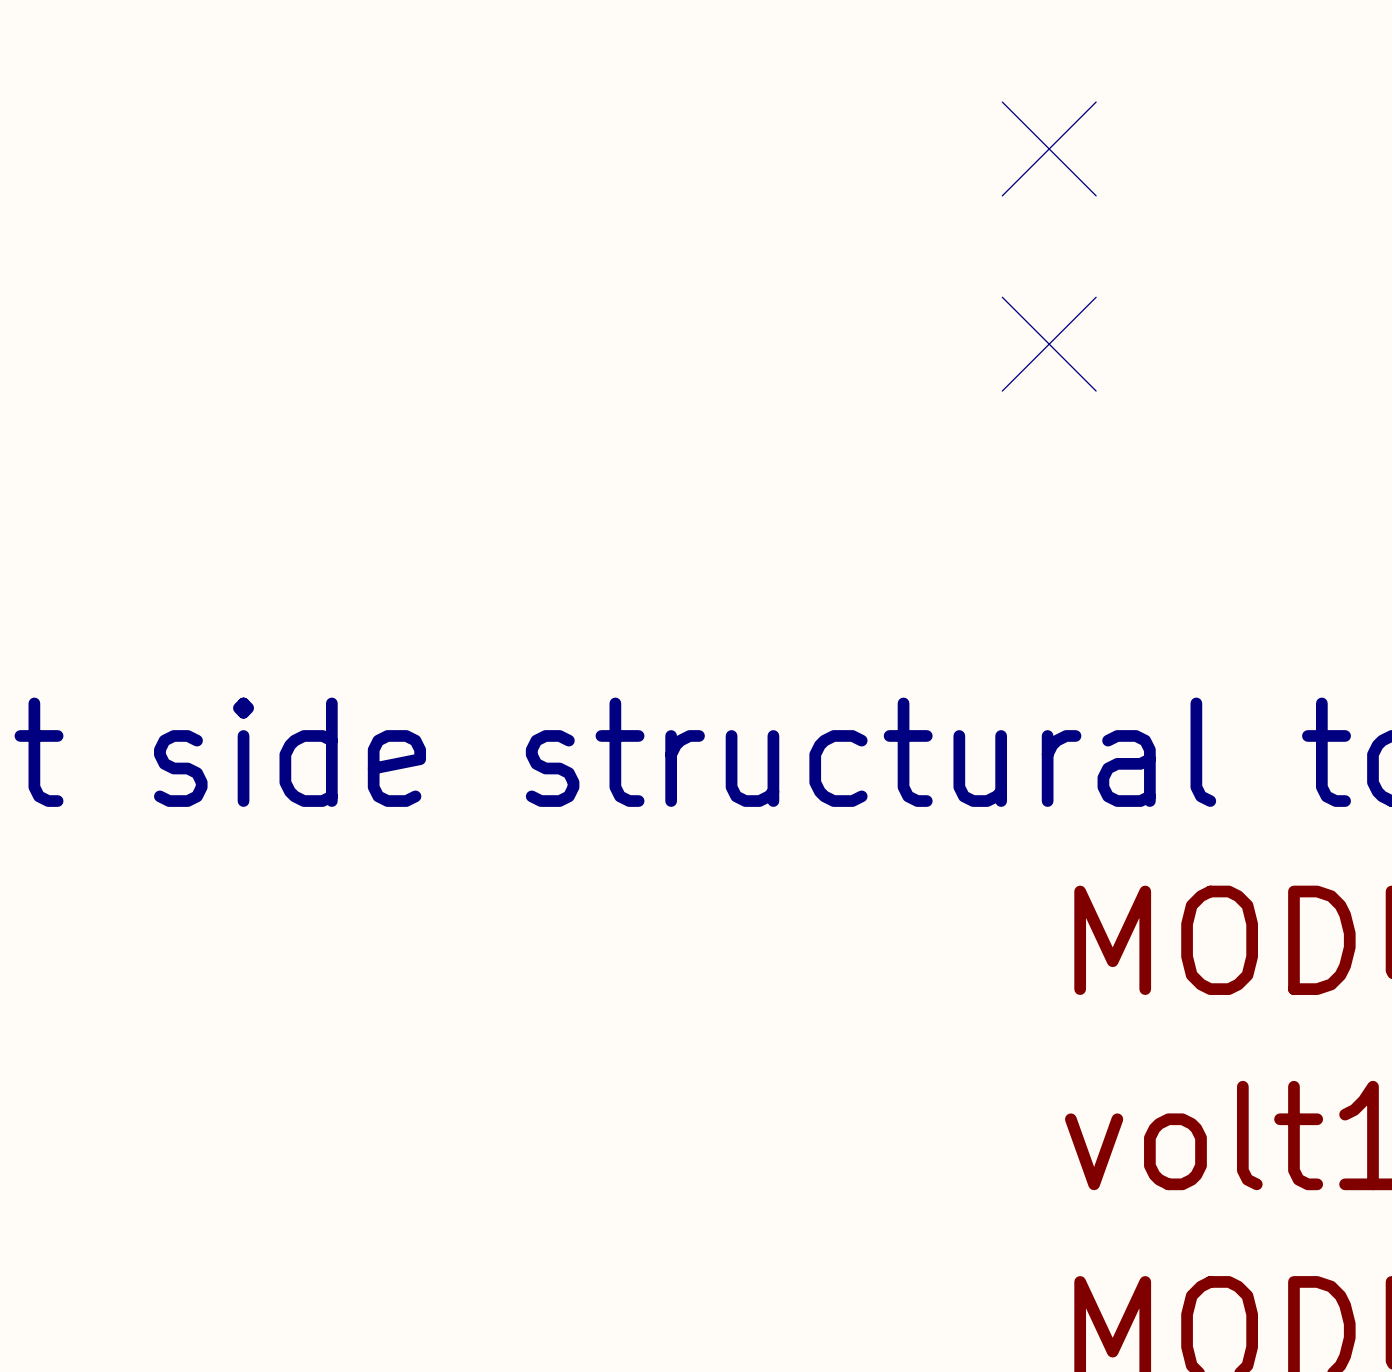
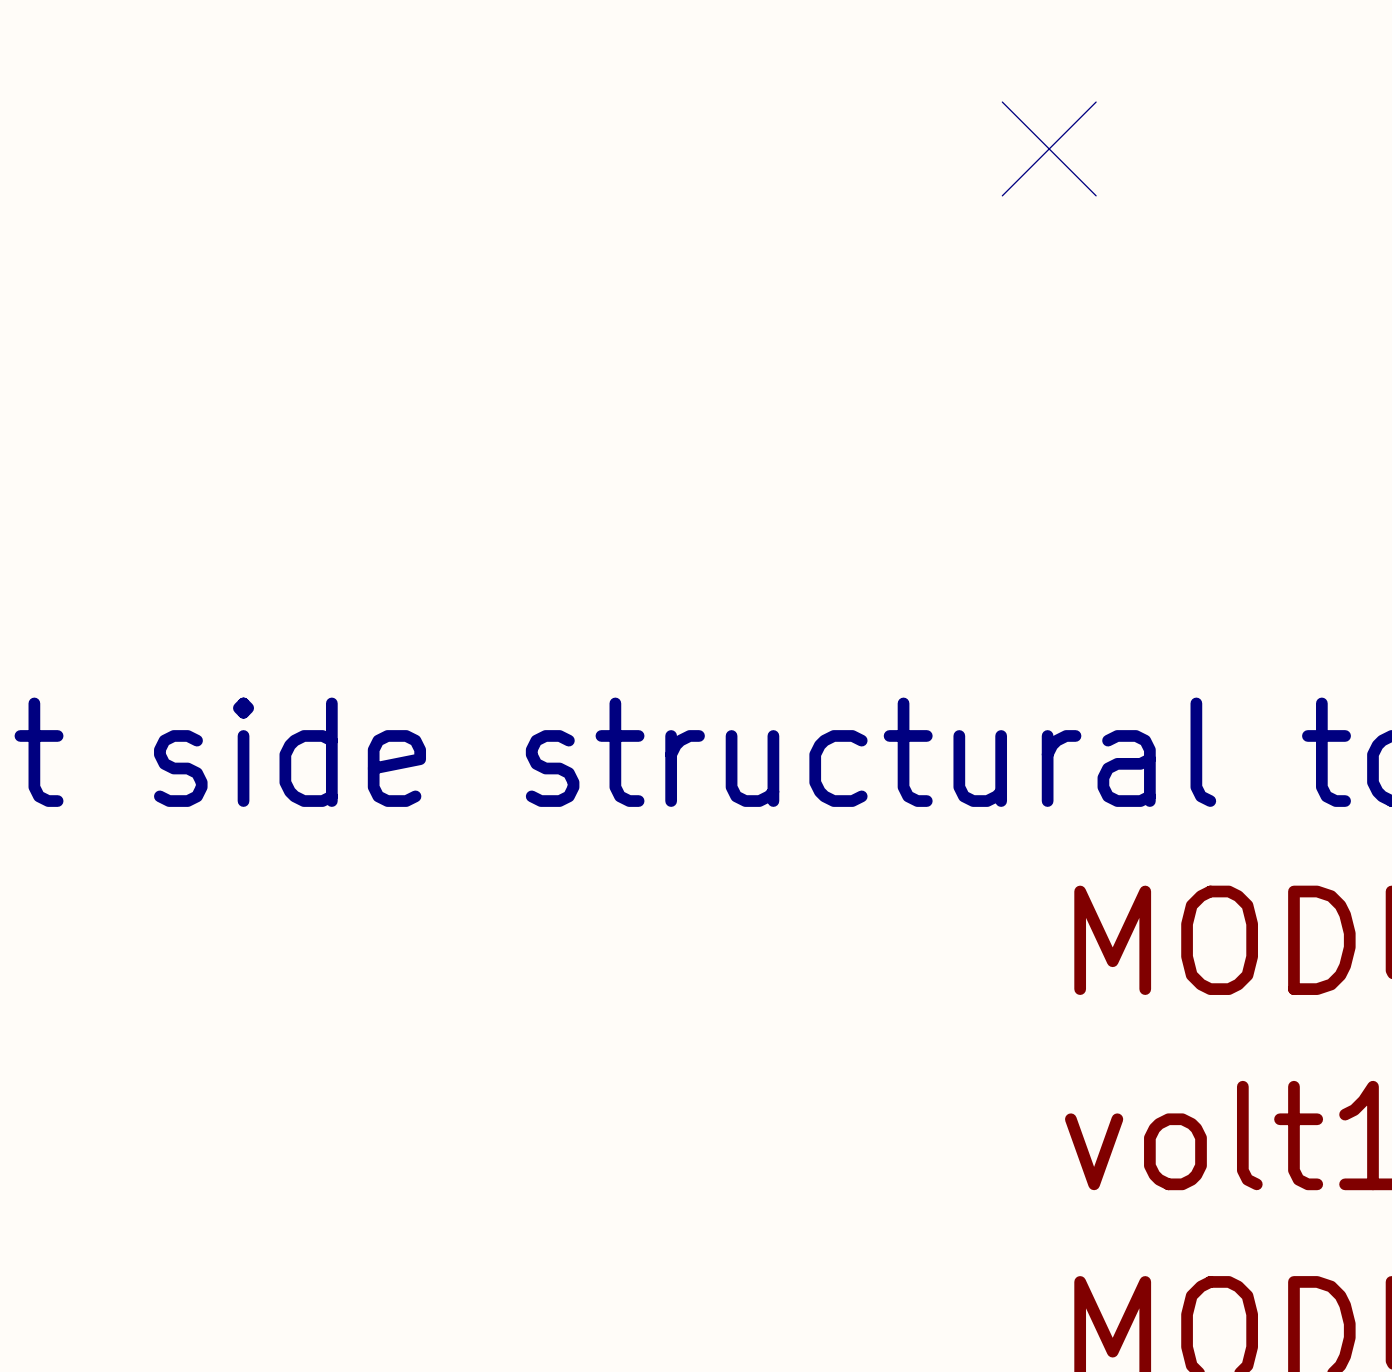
no-connect mark: (1049, 344) -> none

